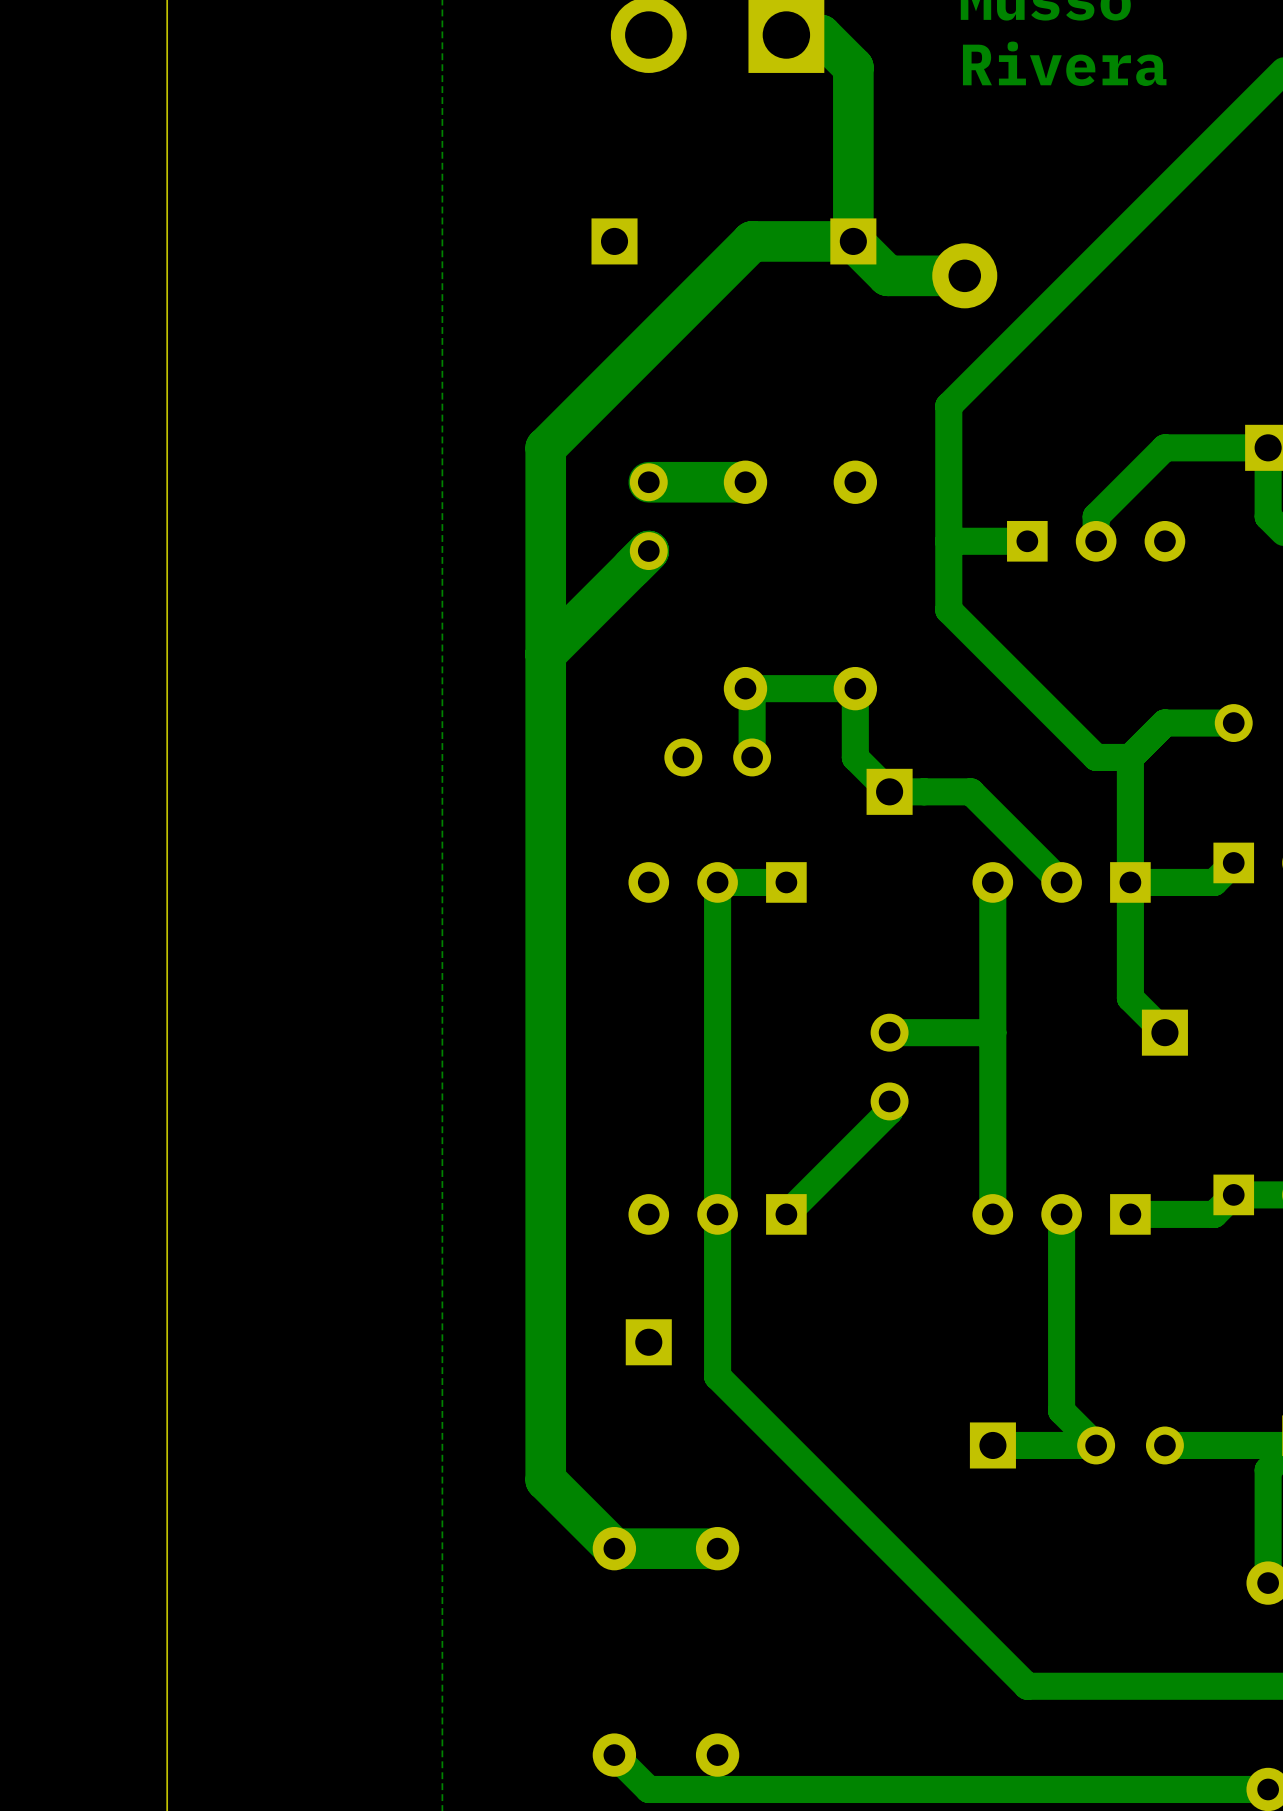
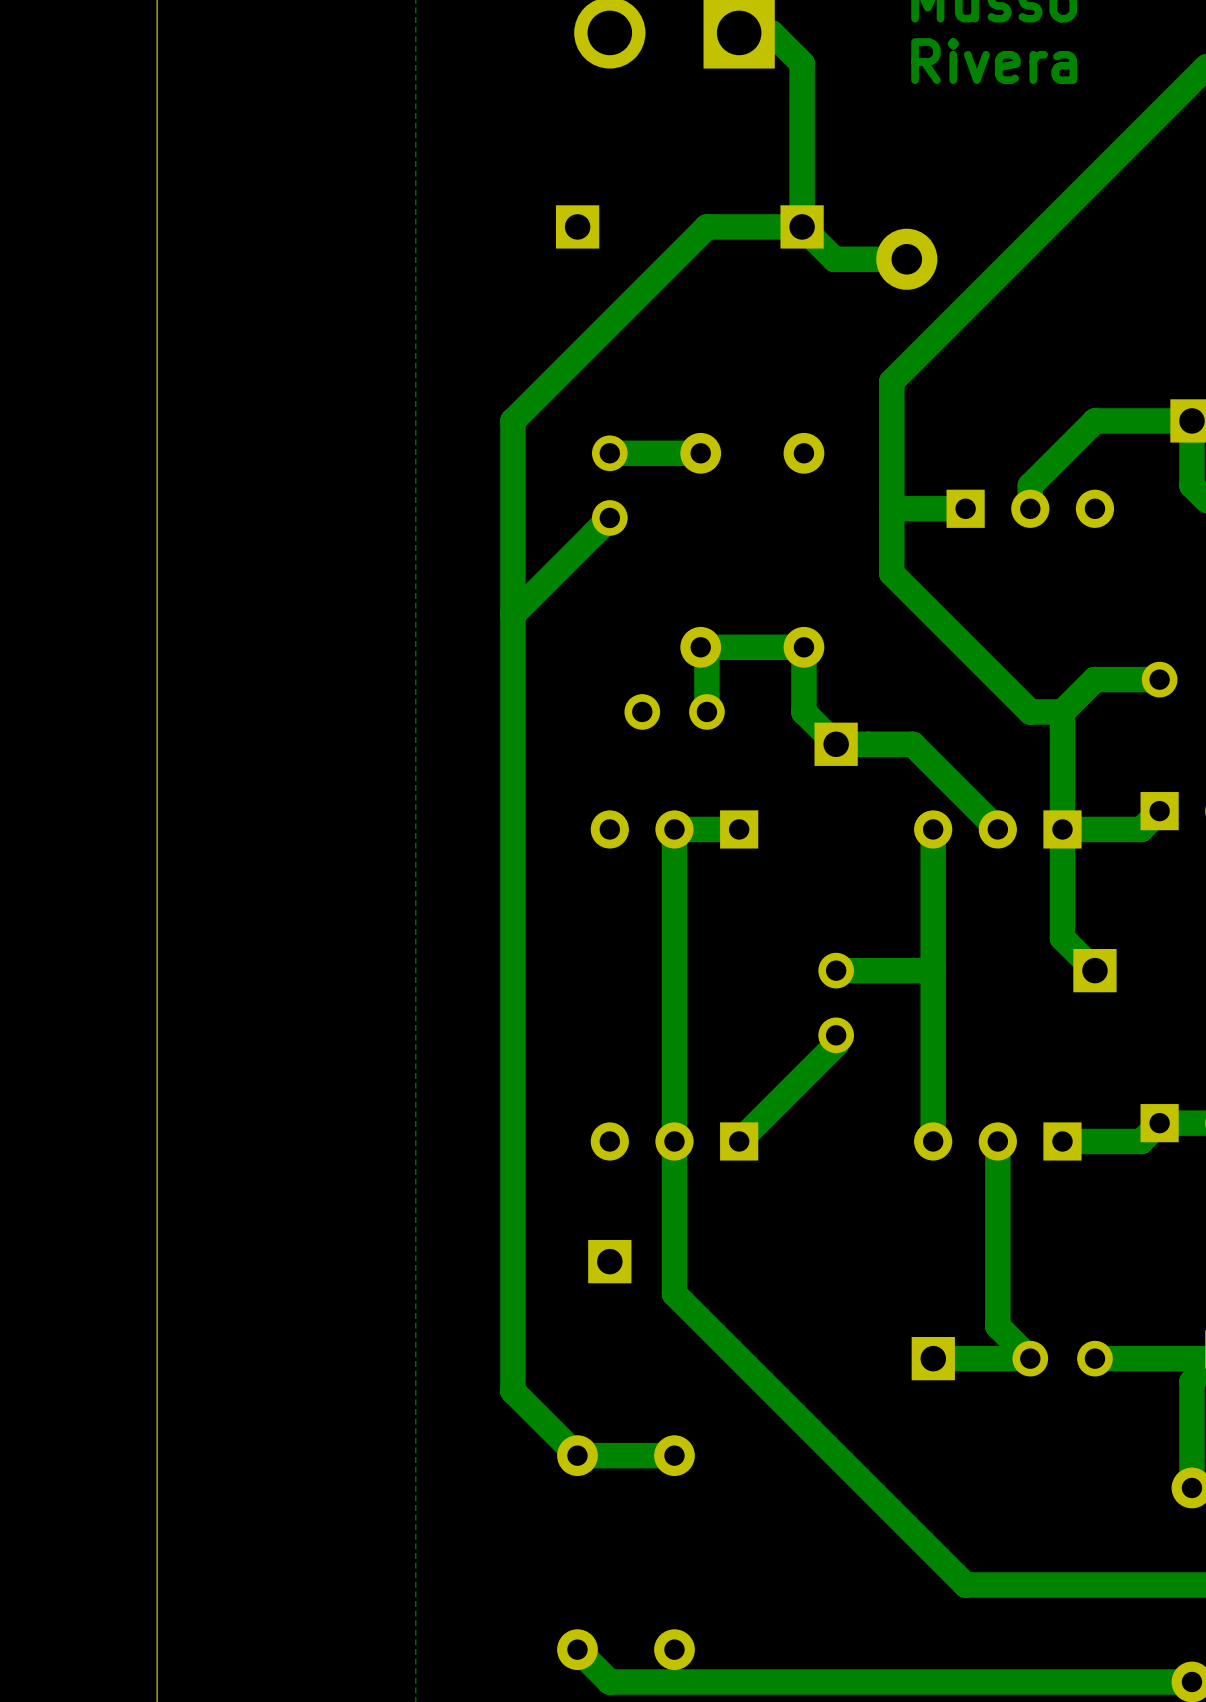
bottom track width: thick (786, 35) (820, 35) (853, 67) (853, 241) -> thin (739, 32) (771, 32) (802, 63) (802, 226)
bottom track width: thick (853, 241) (752, 241) (545, 447) (545, 1480) (614, 1548) (717, 1548) -> thin (802, 226) (706, 226) (512, 420) (512, 1391) (577, 1455) (674, 1455)
bottom track width: thick (853, 241) (887, 275) (964, 275) -> thin (802, 226) (834, 259) (906, 259)
bottom track width: thick (745, 482) (648, 482) -> thin (700, 453) (609, 453)
bottom track width: thick (648, 551) (545, 654) -> thin (609, 517) (512, 614)

